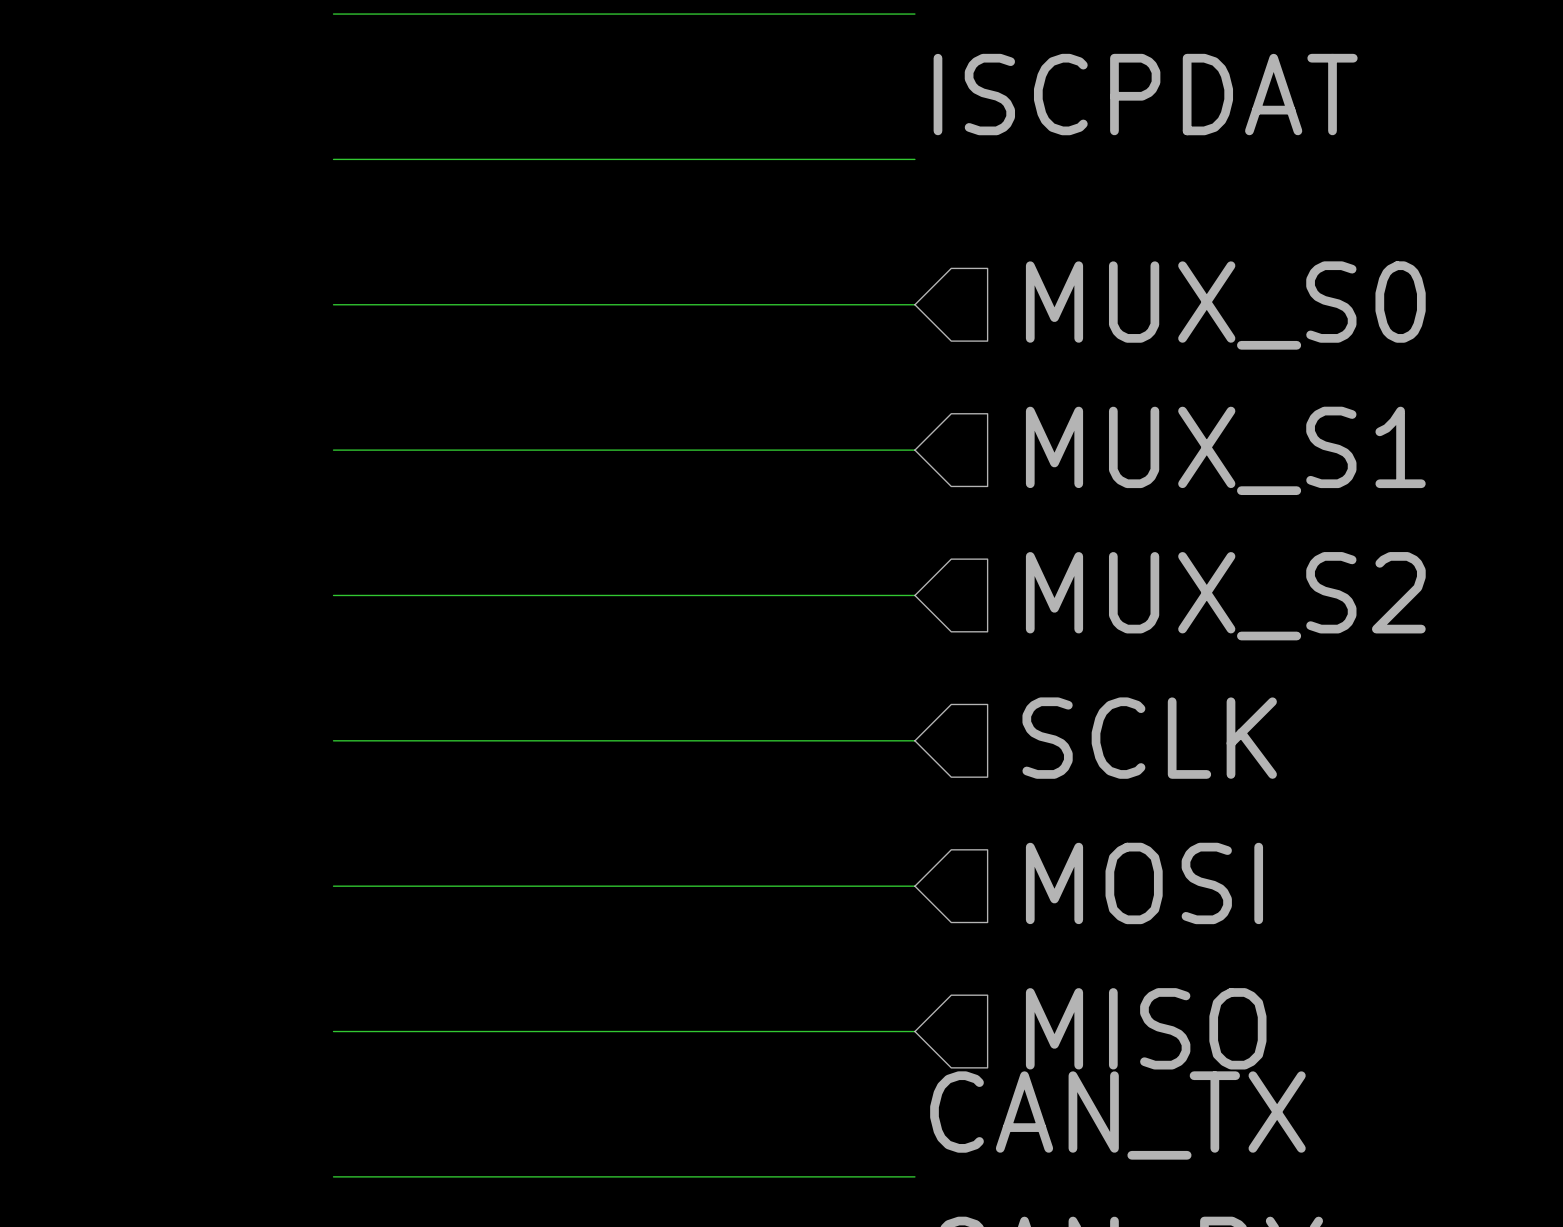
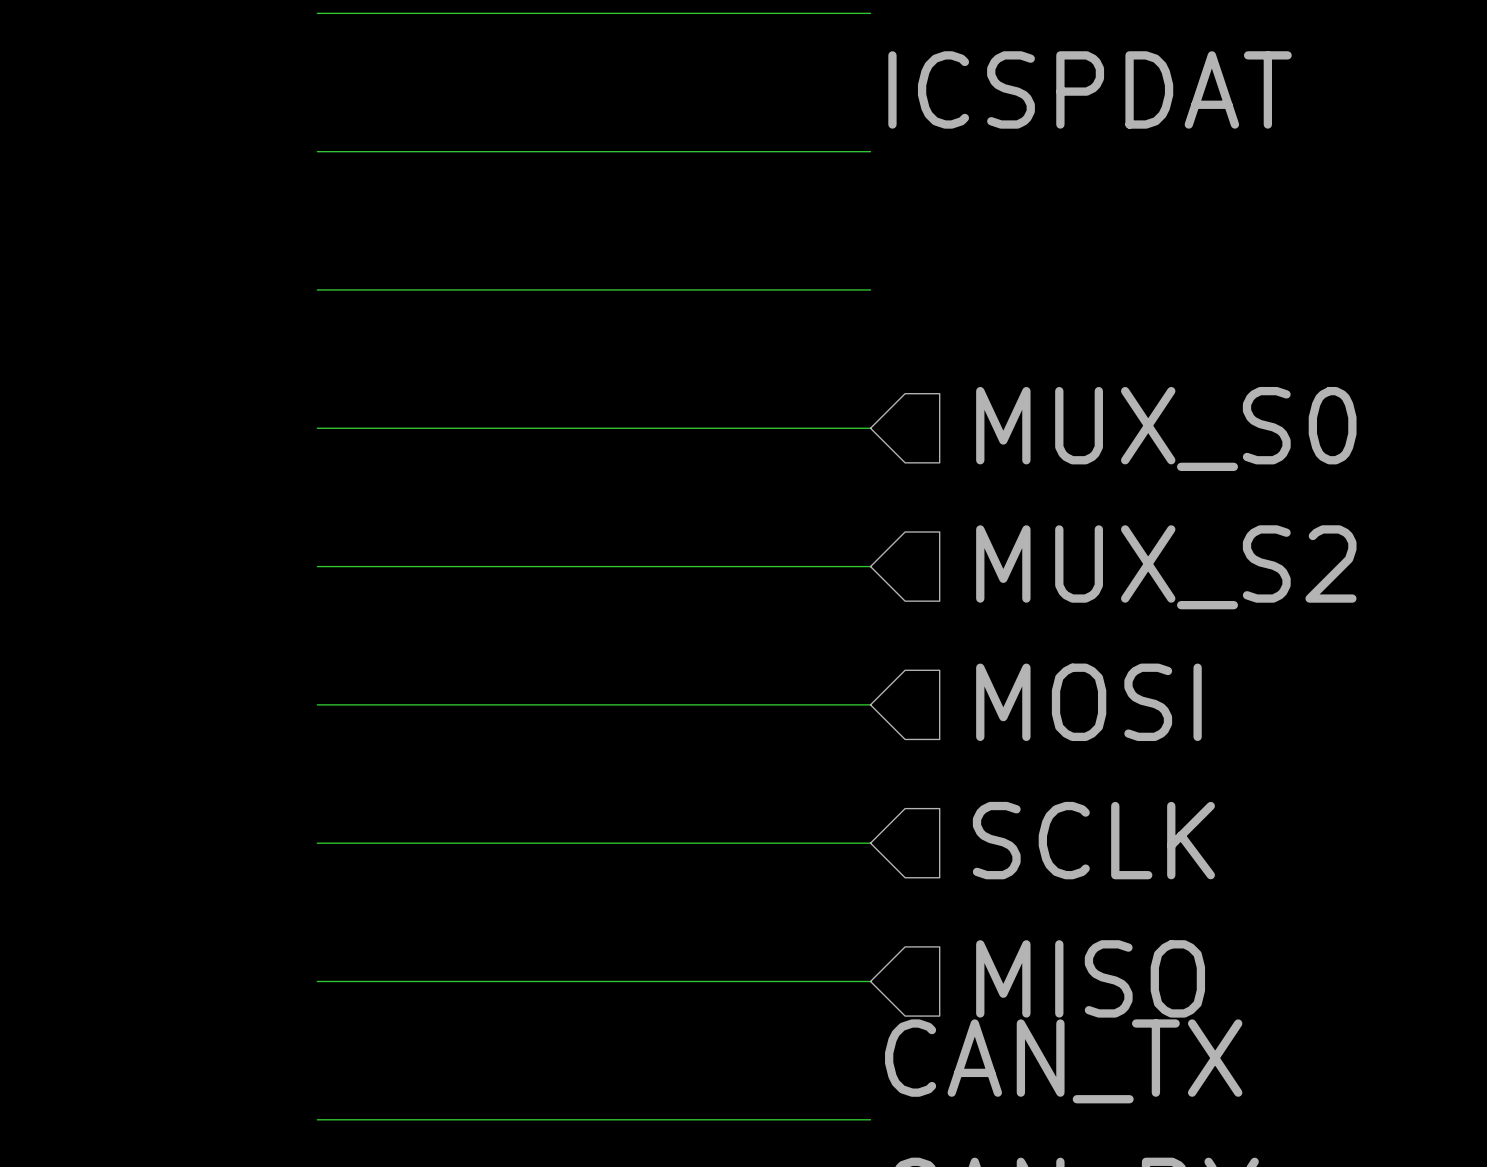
label: ISCPDAT (1145, 94) -> ICSPDAT (1090, 89)
hierarchical label: MUX_S0 (1225, 305) -> none
hierarchical label: MUX_S1 (1225, 450) -> MUX_S0 (1166, 428)
hierarchical label: SCLK (1149, 738) -> MOSI (1088, 702)
hierarchical label: MOSI (1144, 883) -> SCLK (1093, 840)

